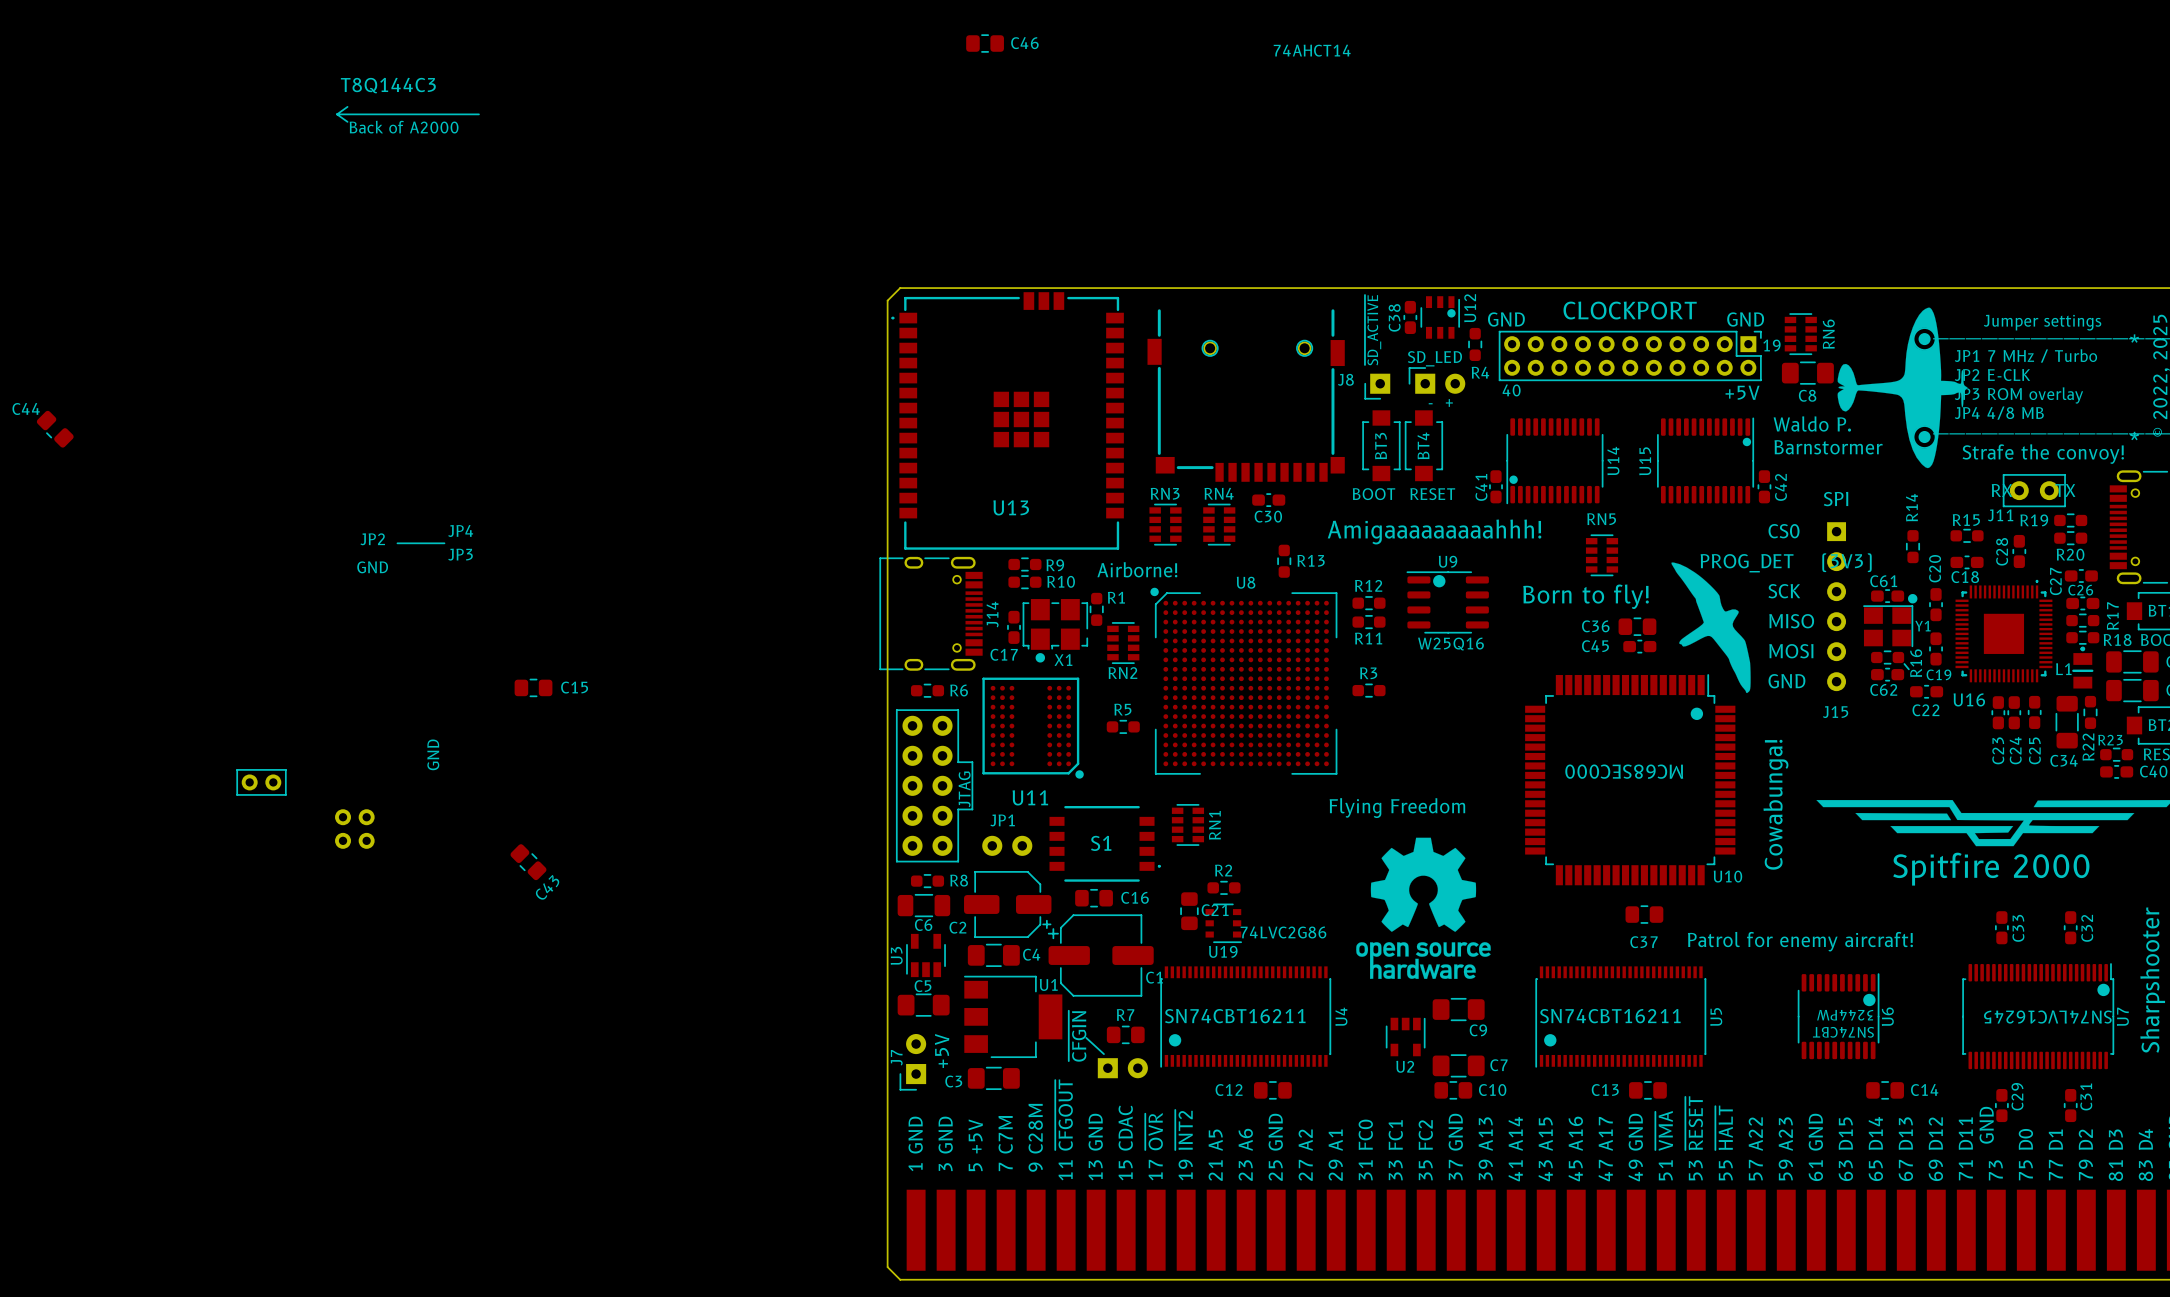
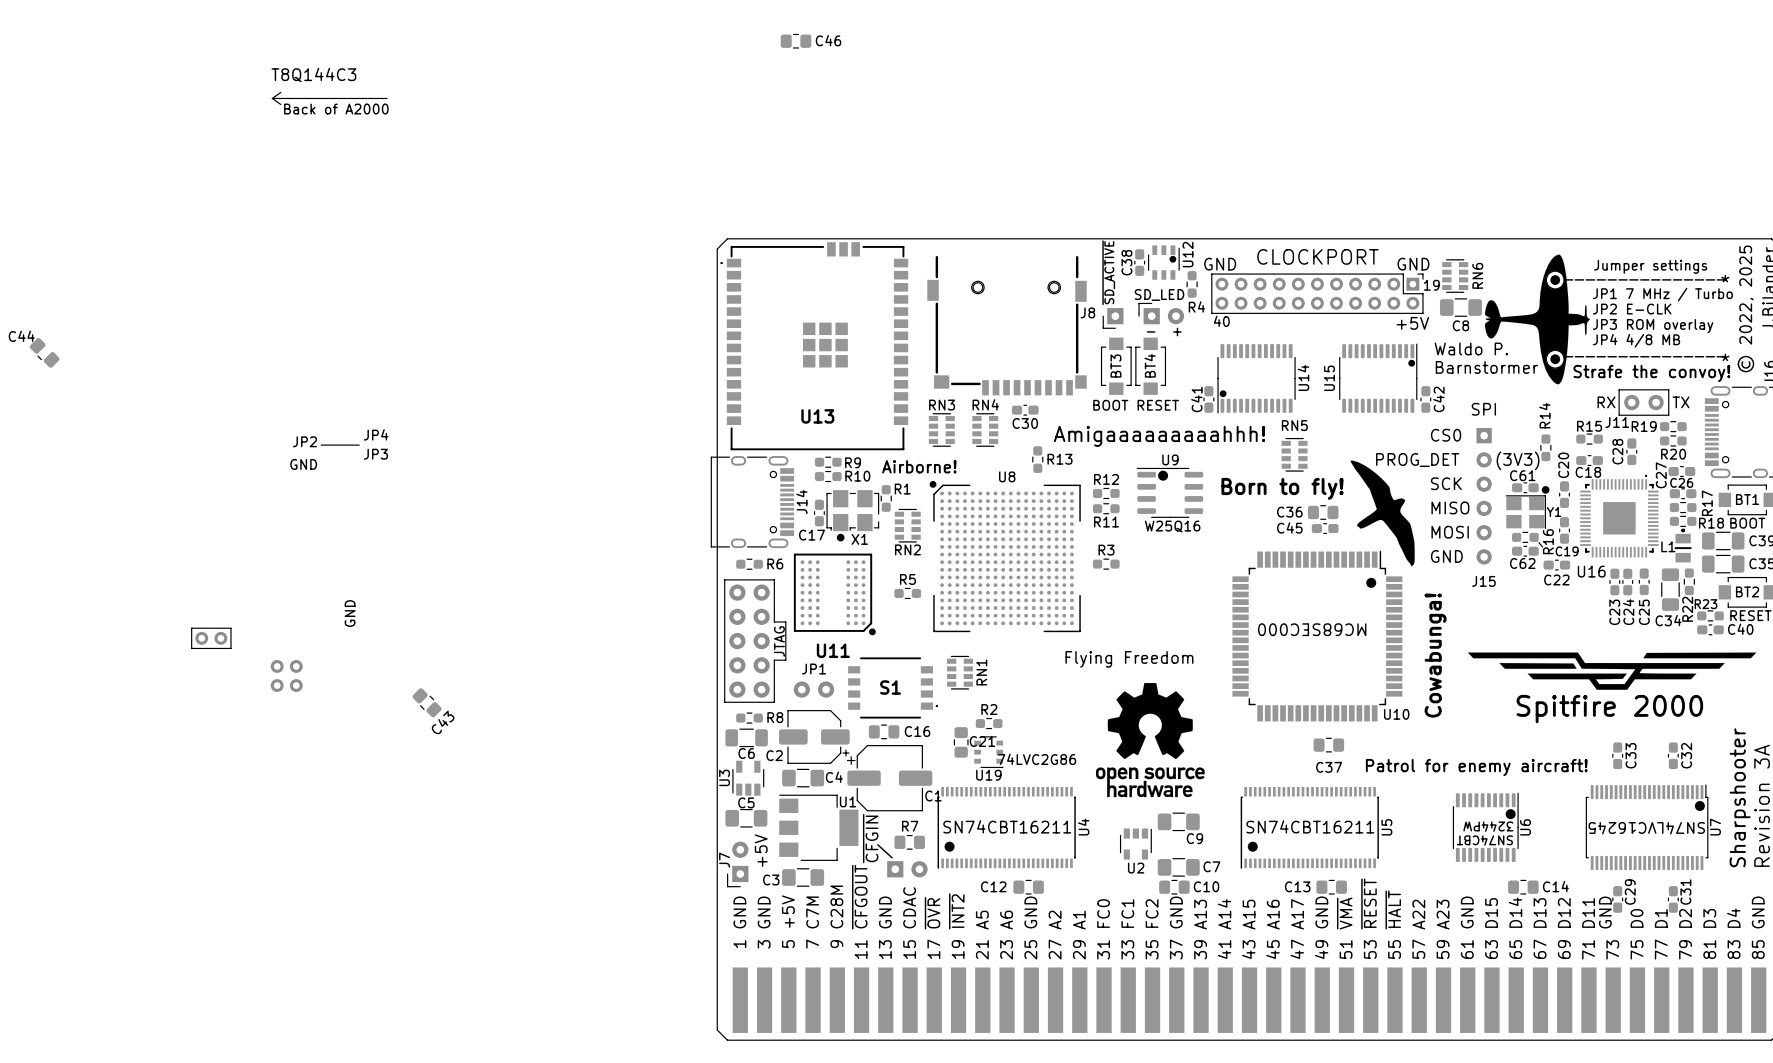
text: 74AHCT14 (1312, 50) -> none
C15: (533, 687) -> none

